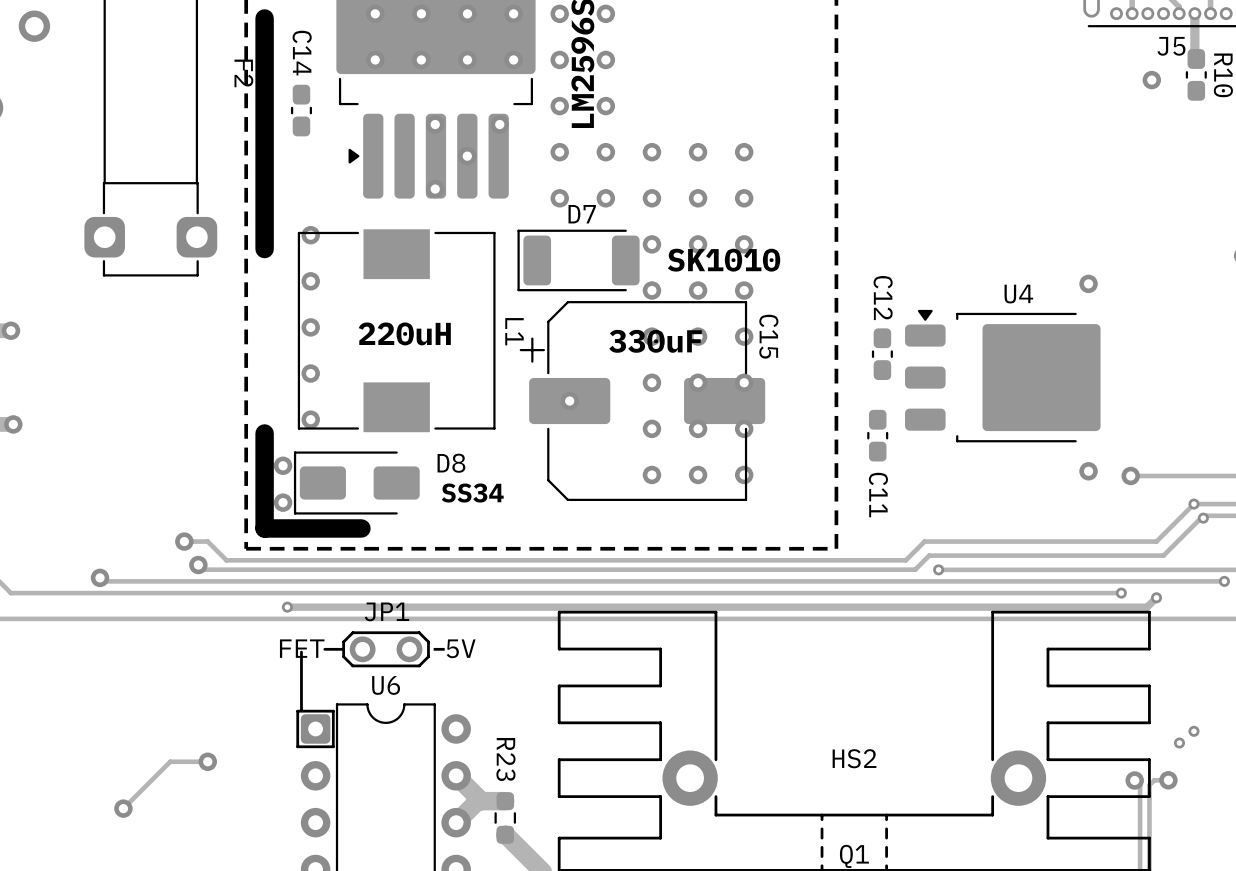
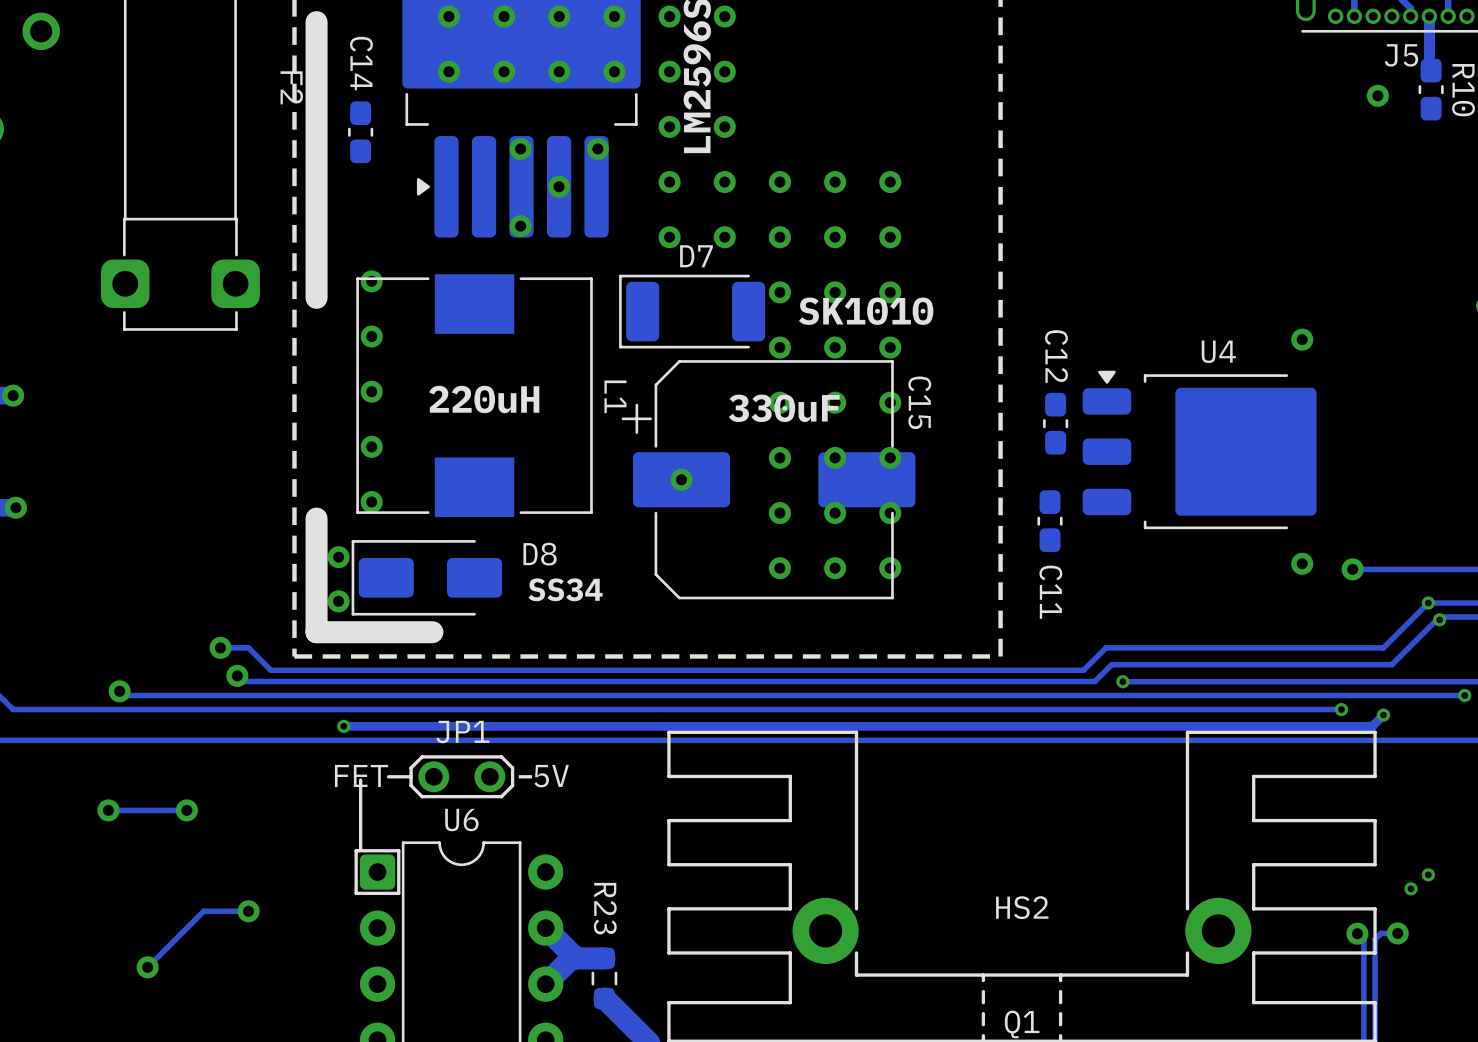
via: none -> (108, 810)
track: none -> (186, 810) (108, 810)
via: none -> (186, 810)

